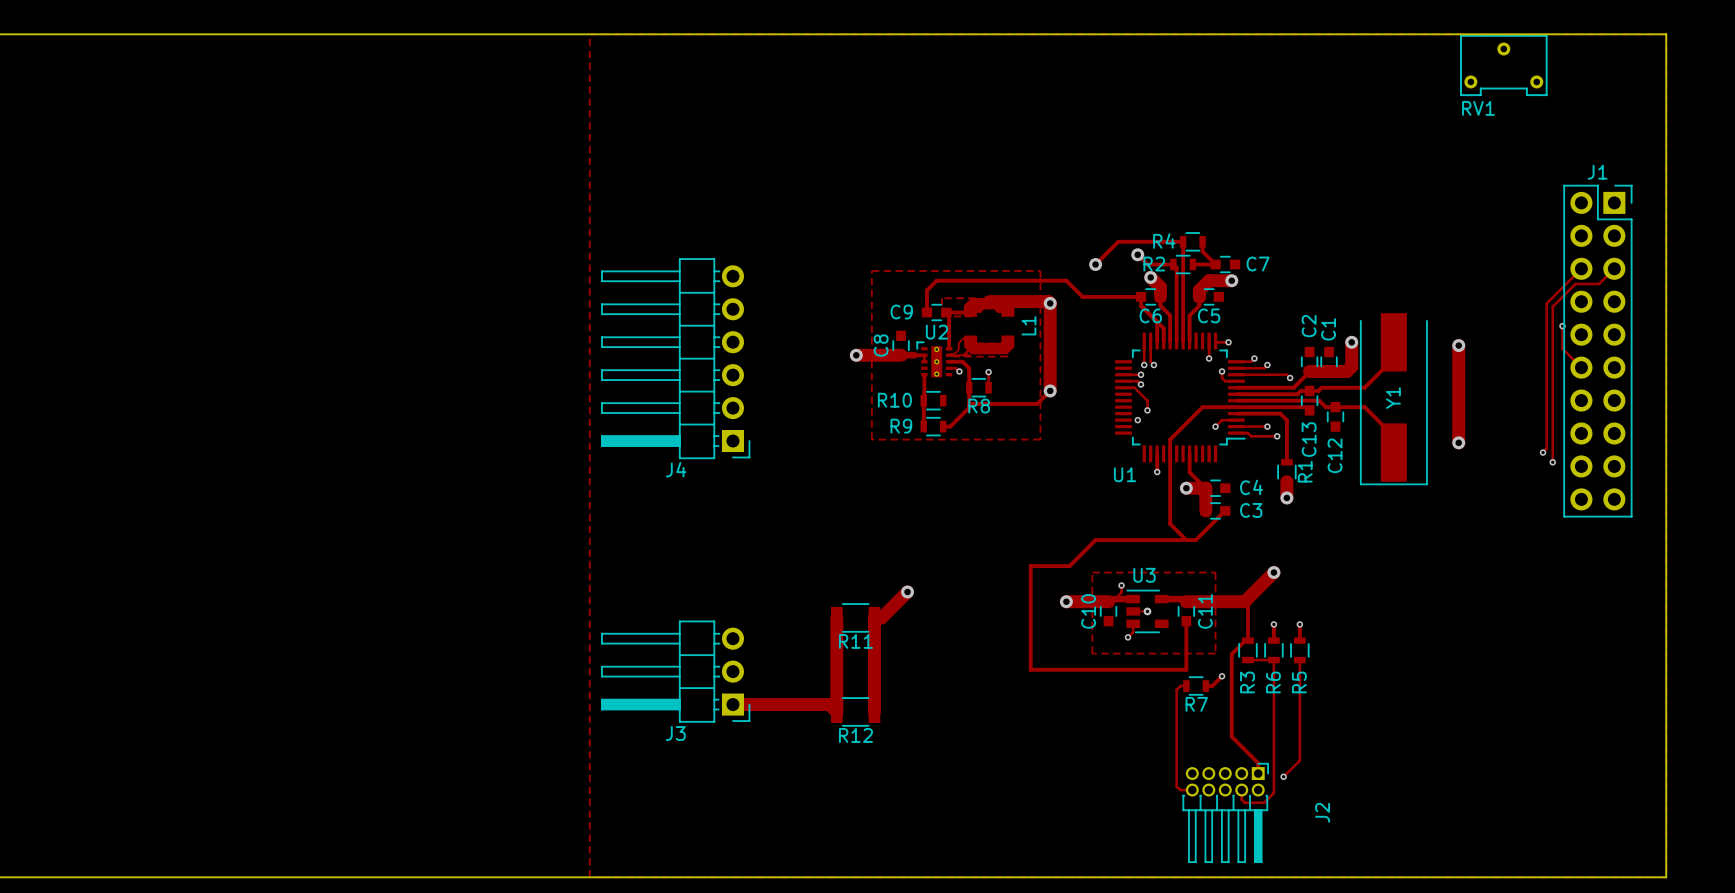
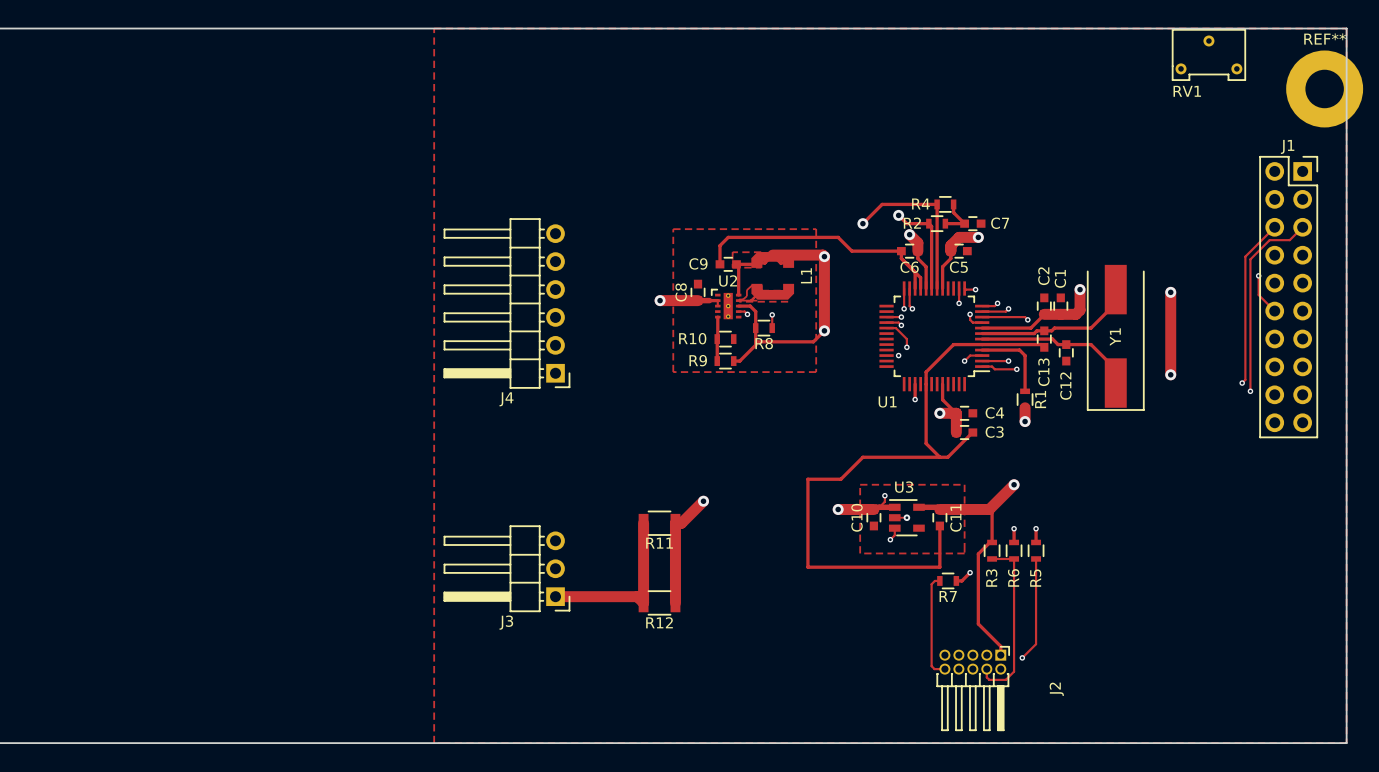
REF**: none -> (1324, 88)

